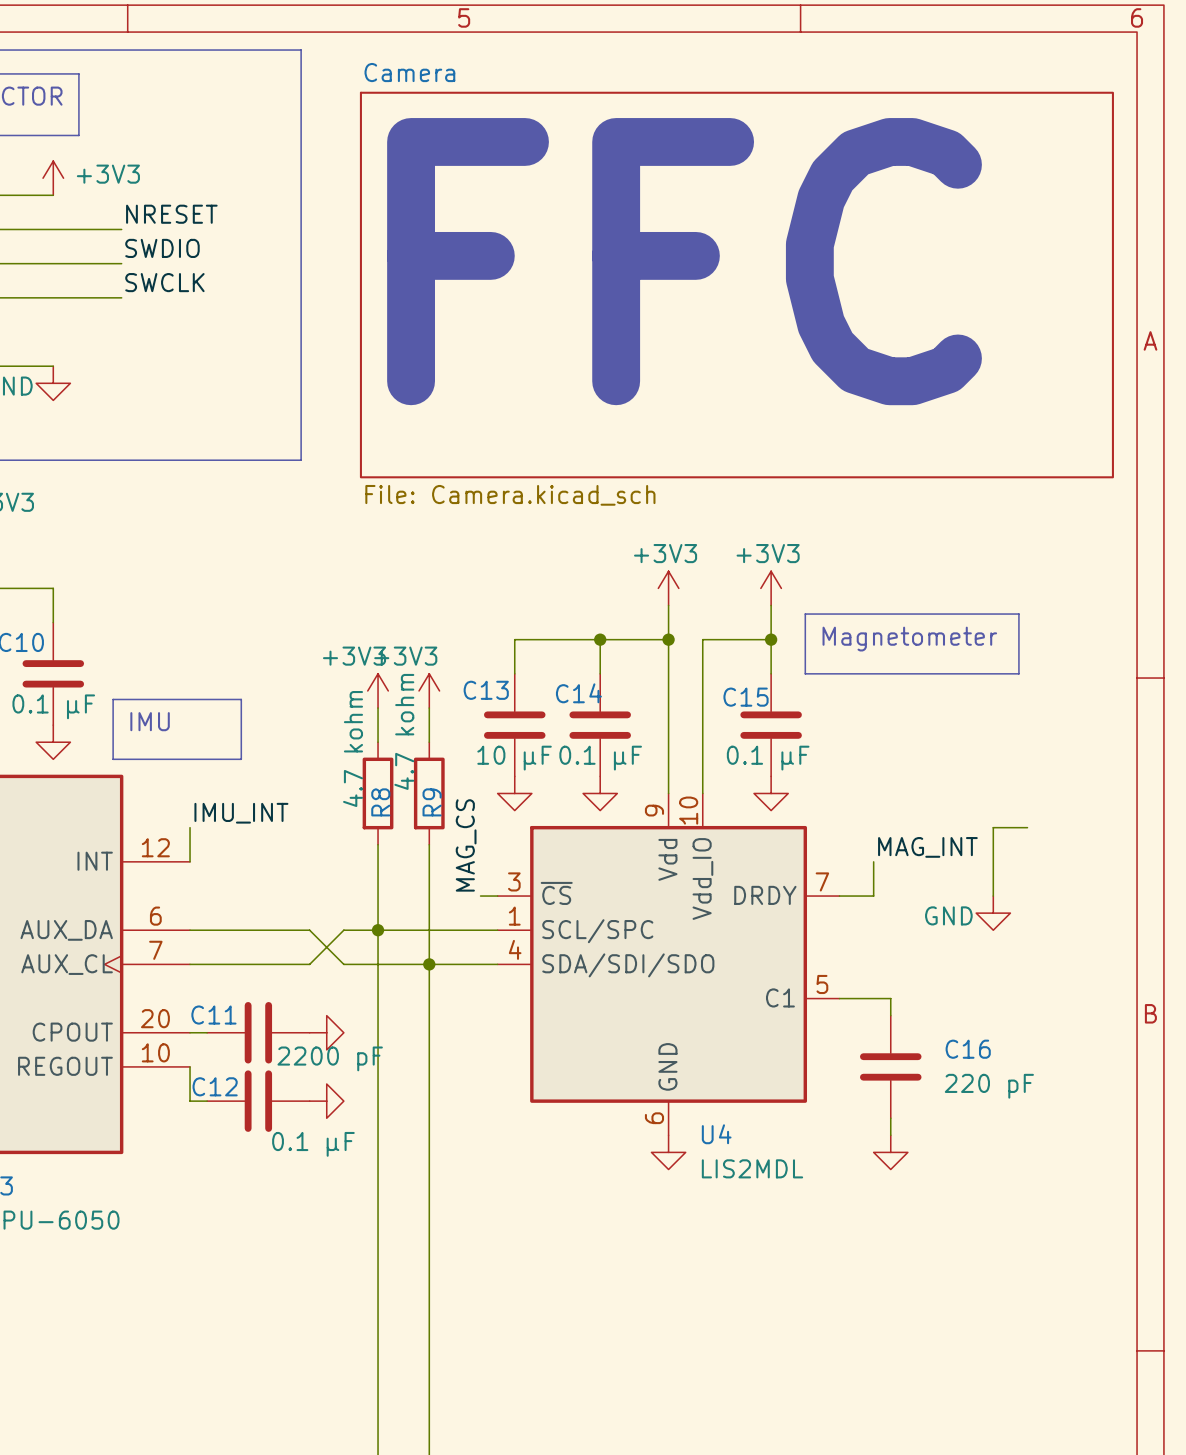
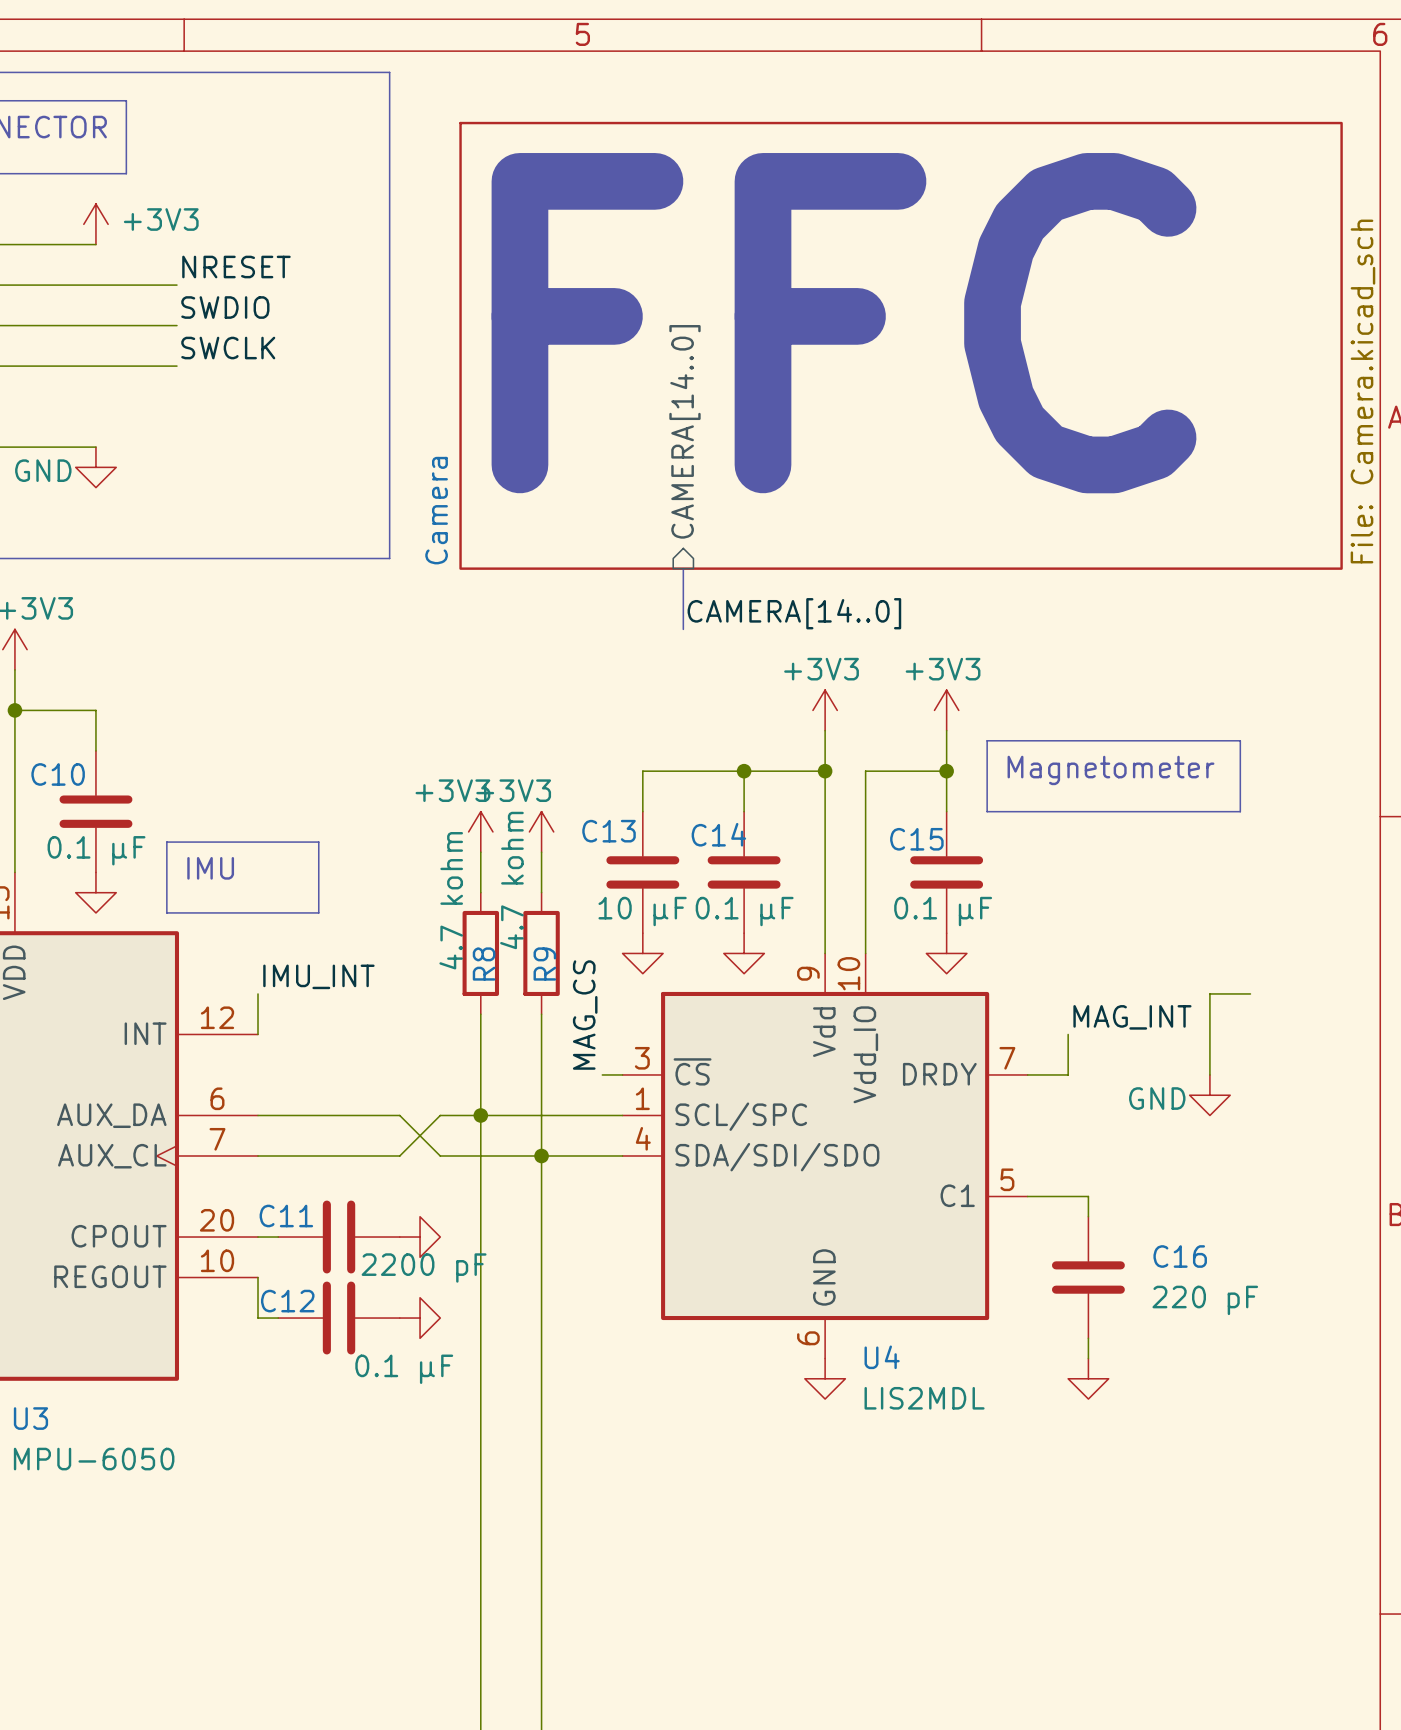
sheet Camera name rotation: 0° (409, 72) -> 90° counterclockwise (436, 510)
sheet Camera name position: Camera (409, 72) -> Camera (436, 510)
sheet Camera shape: [359, 91, 1114, 479] -> [459, 121, 1343, 570]
sheet pin: none -> CAMERA[14..0] (684, 431)
bus: none -> (683, 568) (683, 629)
sheet Camera value rotation: 0° (510, 495) -> 90° counterclockwise (1362, 391)
sheet Camera value position: File: Camera.kicad_sch (510, 495) -> File: Camera.kicad_sch (1362, 391)
label: none -> CAMERA[14..0] (794, 613)

